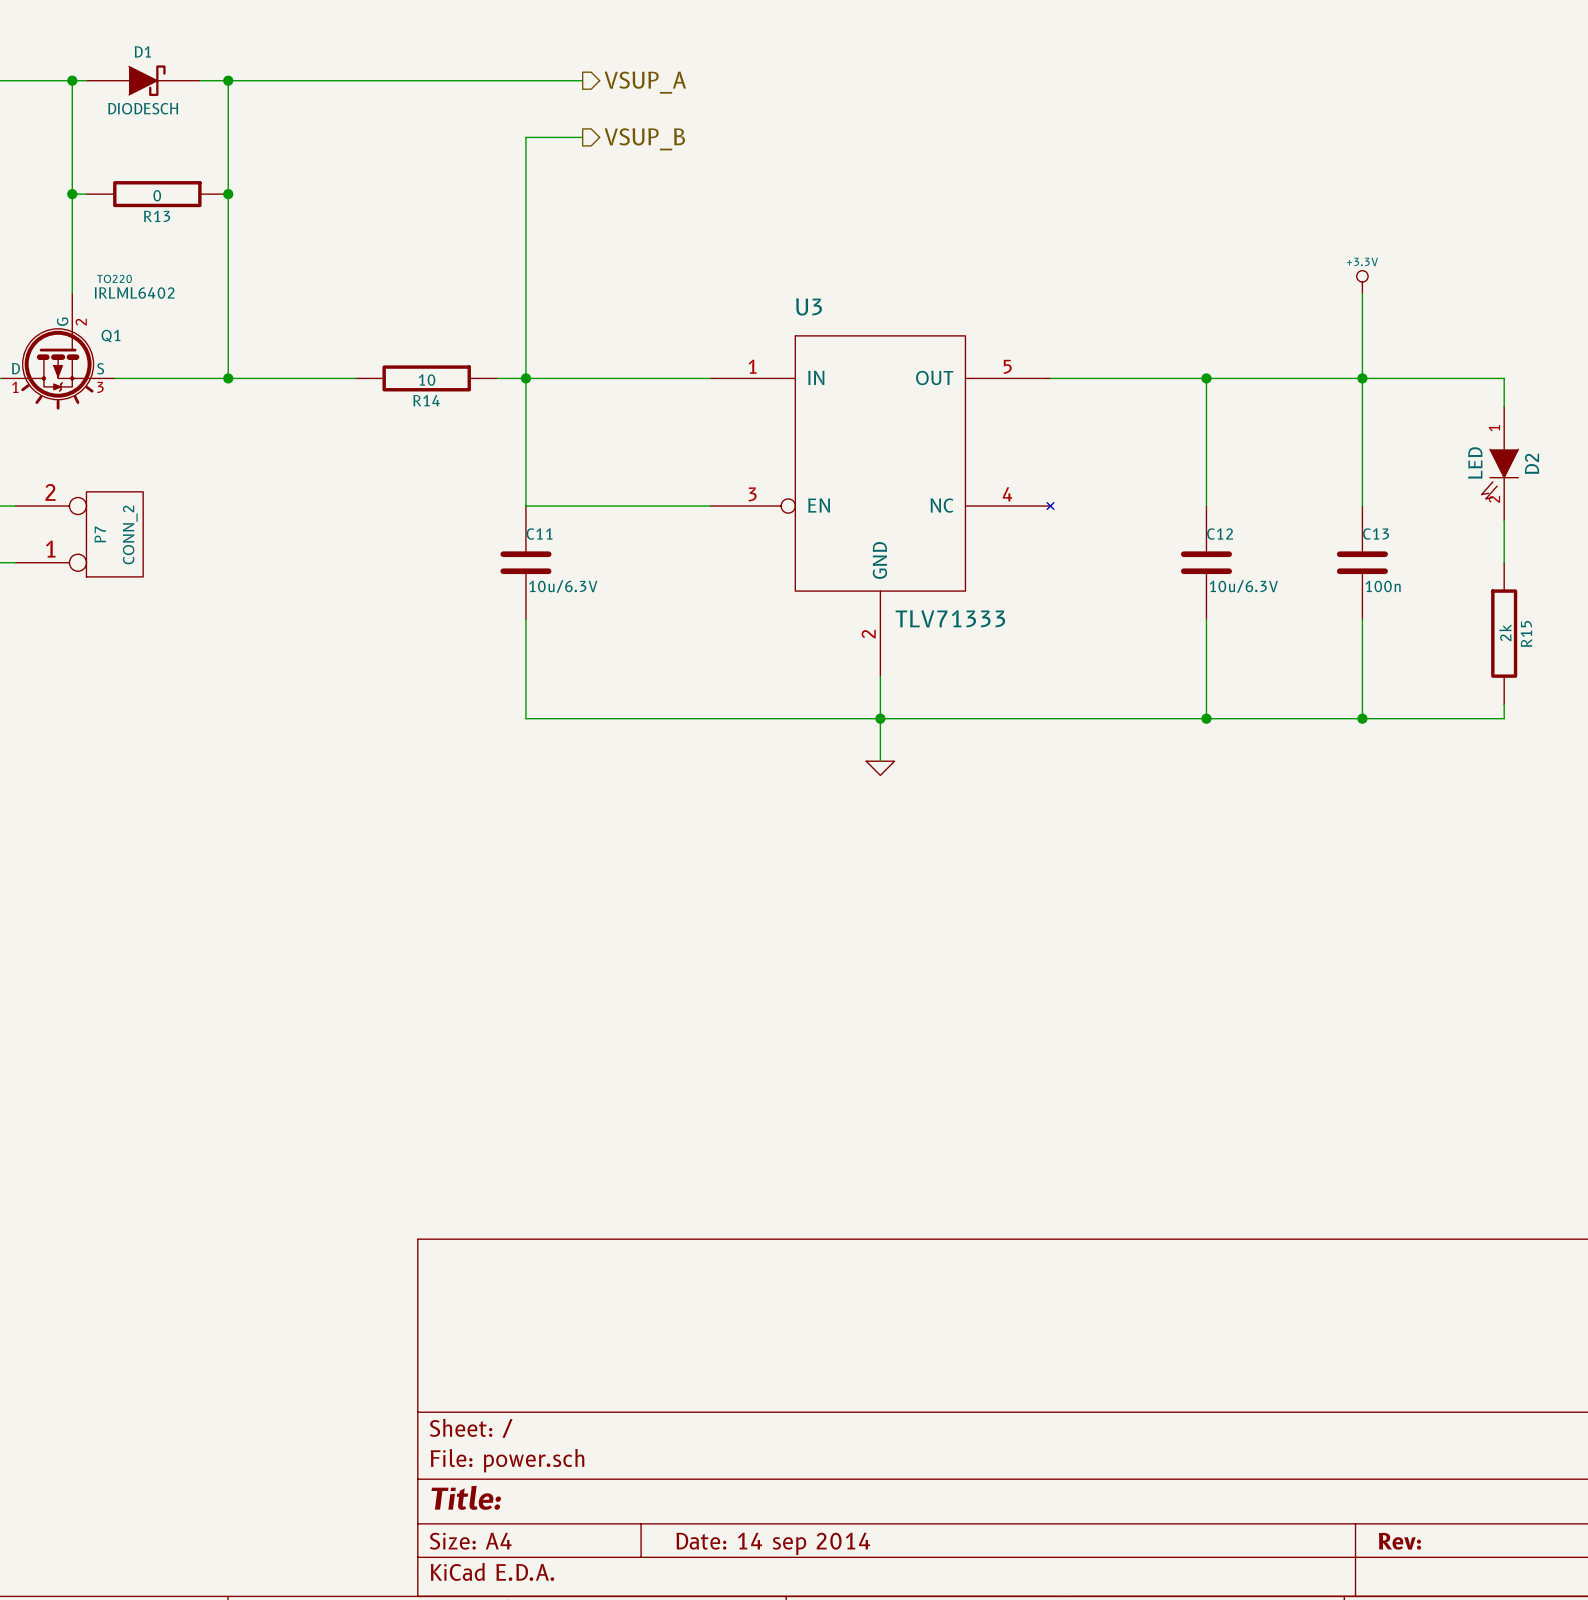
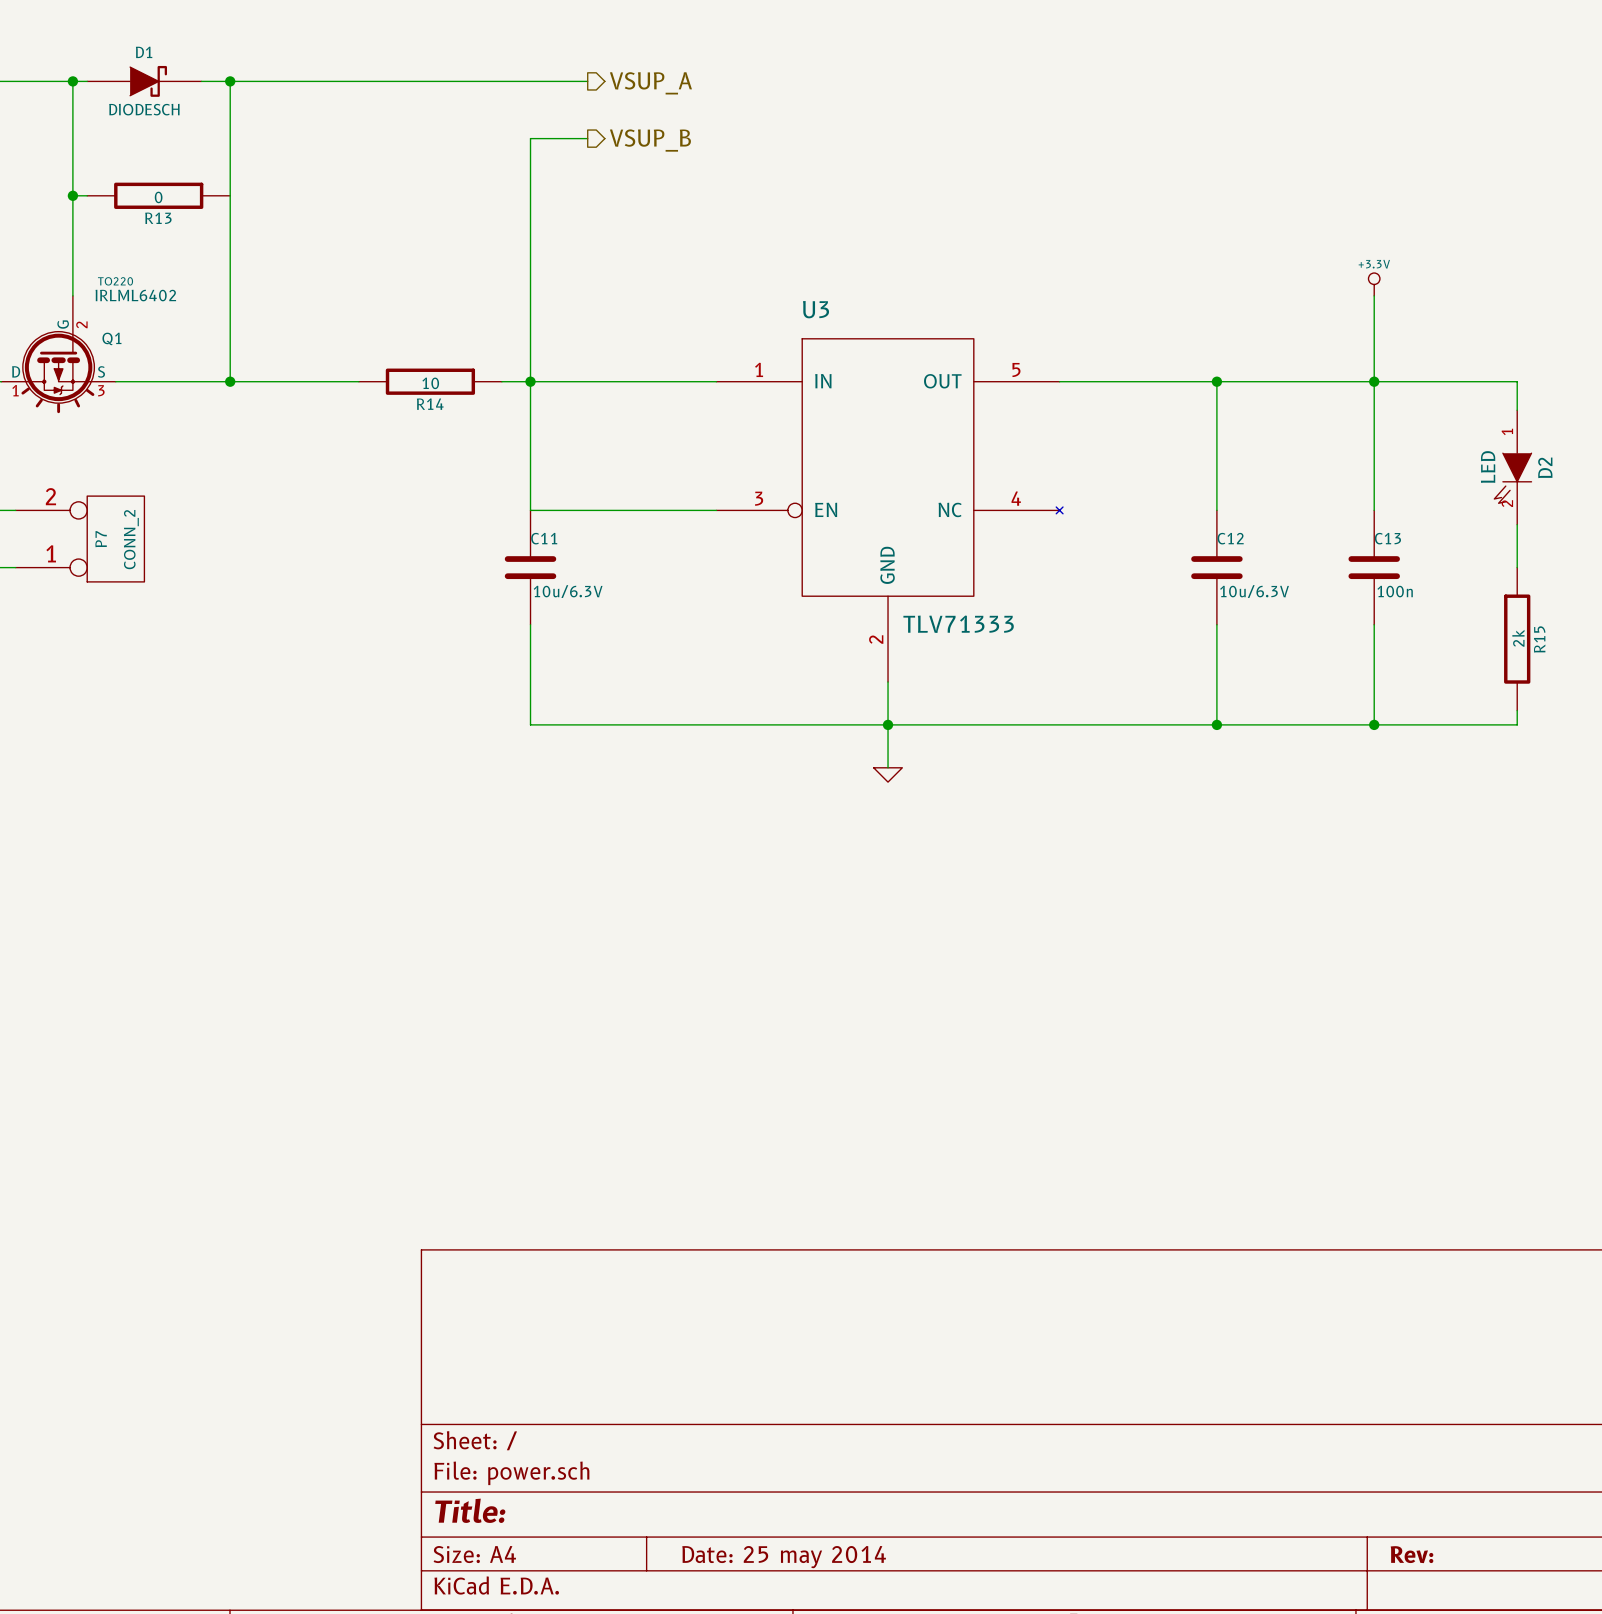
junction: (228, 194) -> none
title block: Date: 14 sep 2014 (773, 1543) -> Date: 25 may 2014 (784, 1557)

